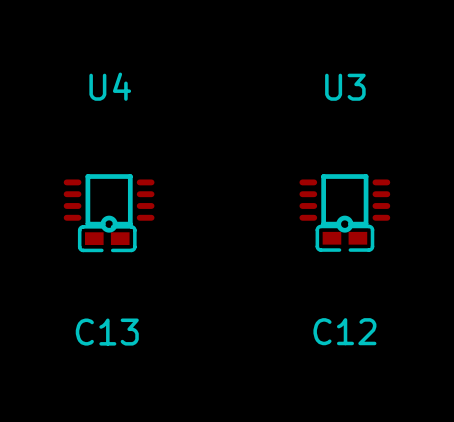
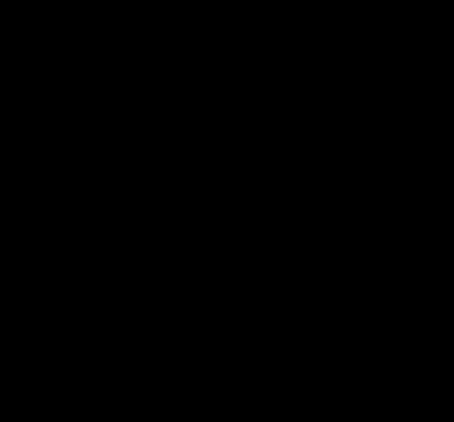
U4: (109, 203) -> none
U3: (344, 203) -> none
C13: (107, 238) -> none
C12: (344, 238) -> none

